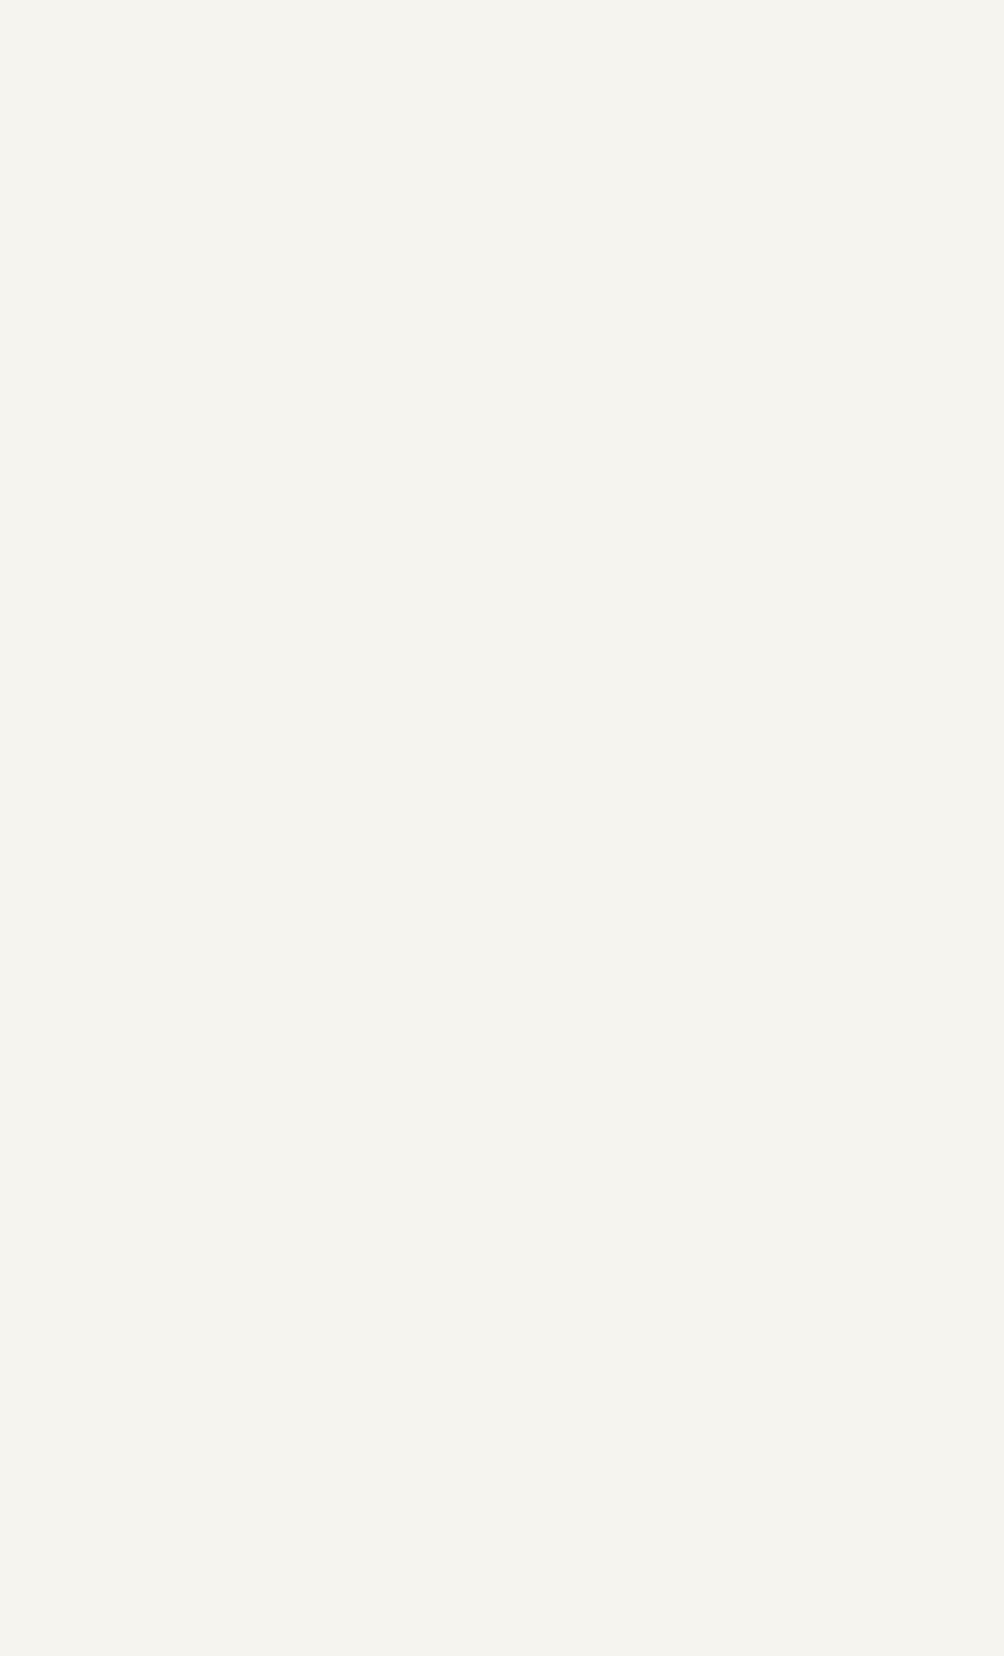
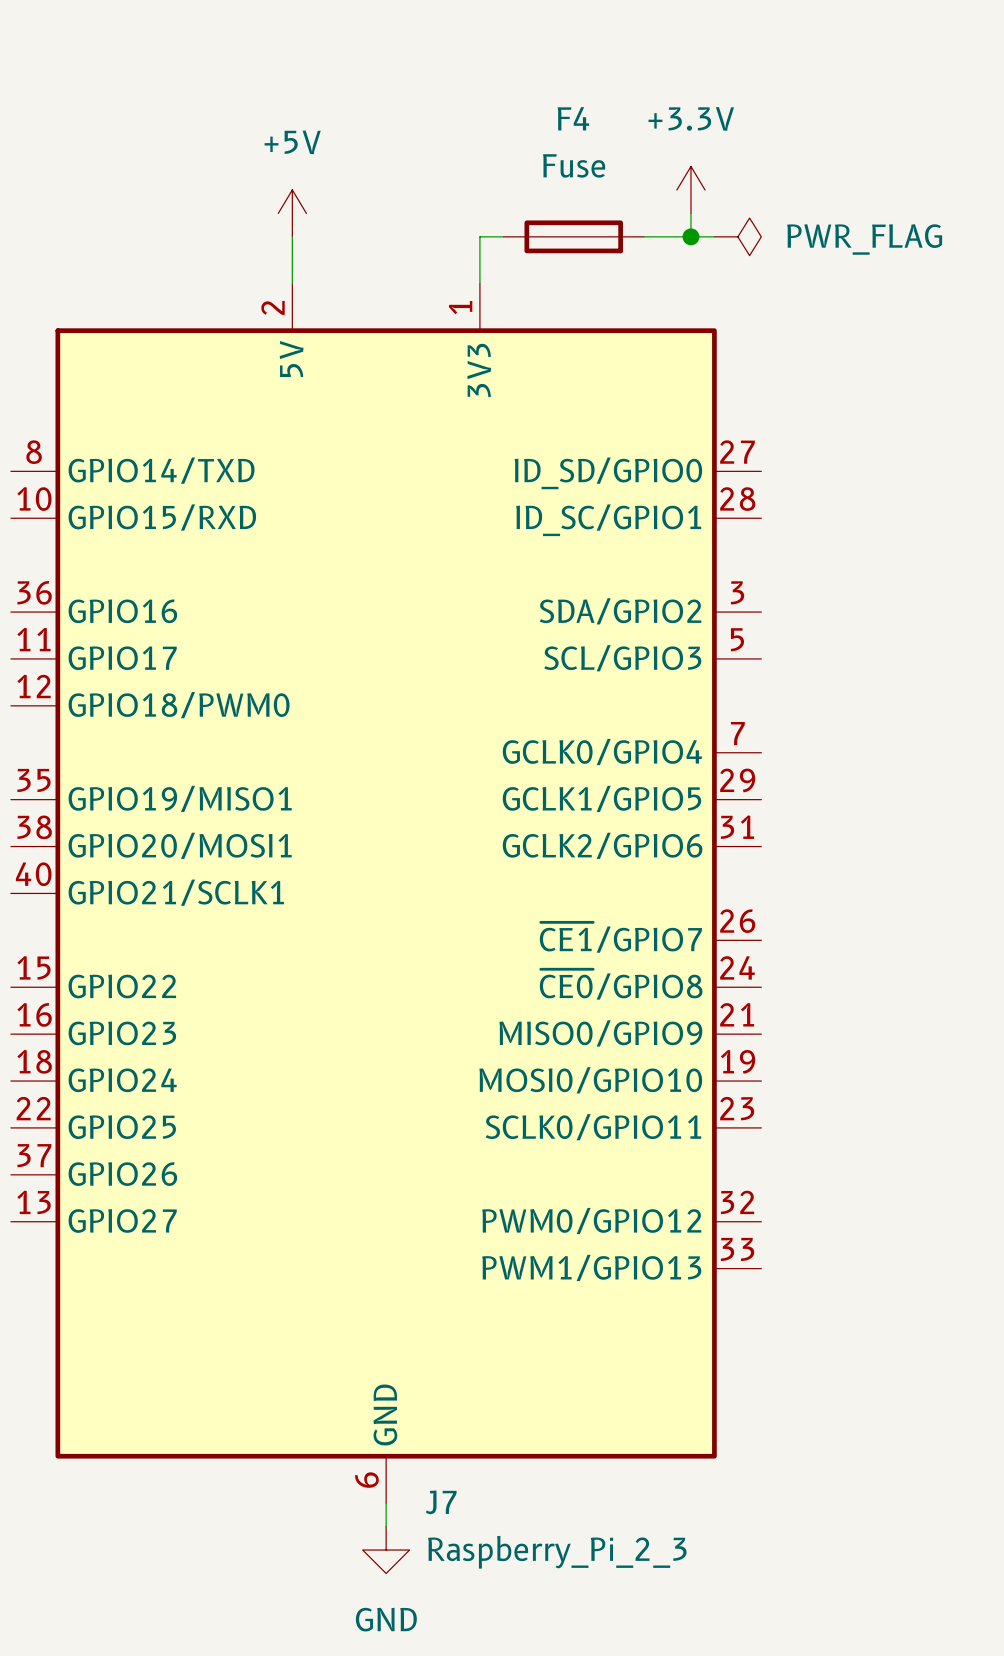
power symbol: none -> +3.3V (690, 189)
power symbol: none -> +5V (292, 213)
wire: none -> (690, 213) (690, 236)
wire: none -> (292, 236) (292, 283)
wire: none -> (503, 236) (479, 236) (479, 283)
F4: none -> Fuse (573, 236)
wire: none -> (644, 236) (714, 236)
junction: none -> (690, 236)
power symbol: none -> PWR_FLAG (737, 236)
J7: none -> Raspberry_Pi_2_3 (386, 893)
wire: none -> (386, 1503) (386, 1526)
power symbol: none -> GND (386, 1550)

